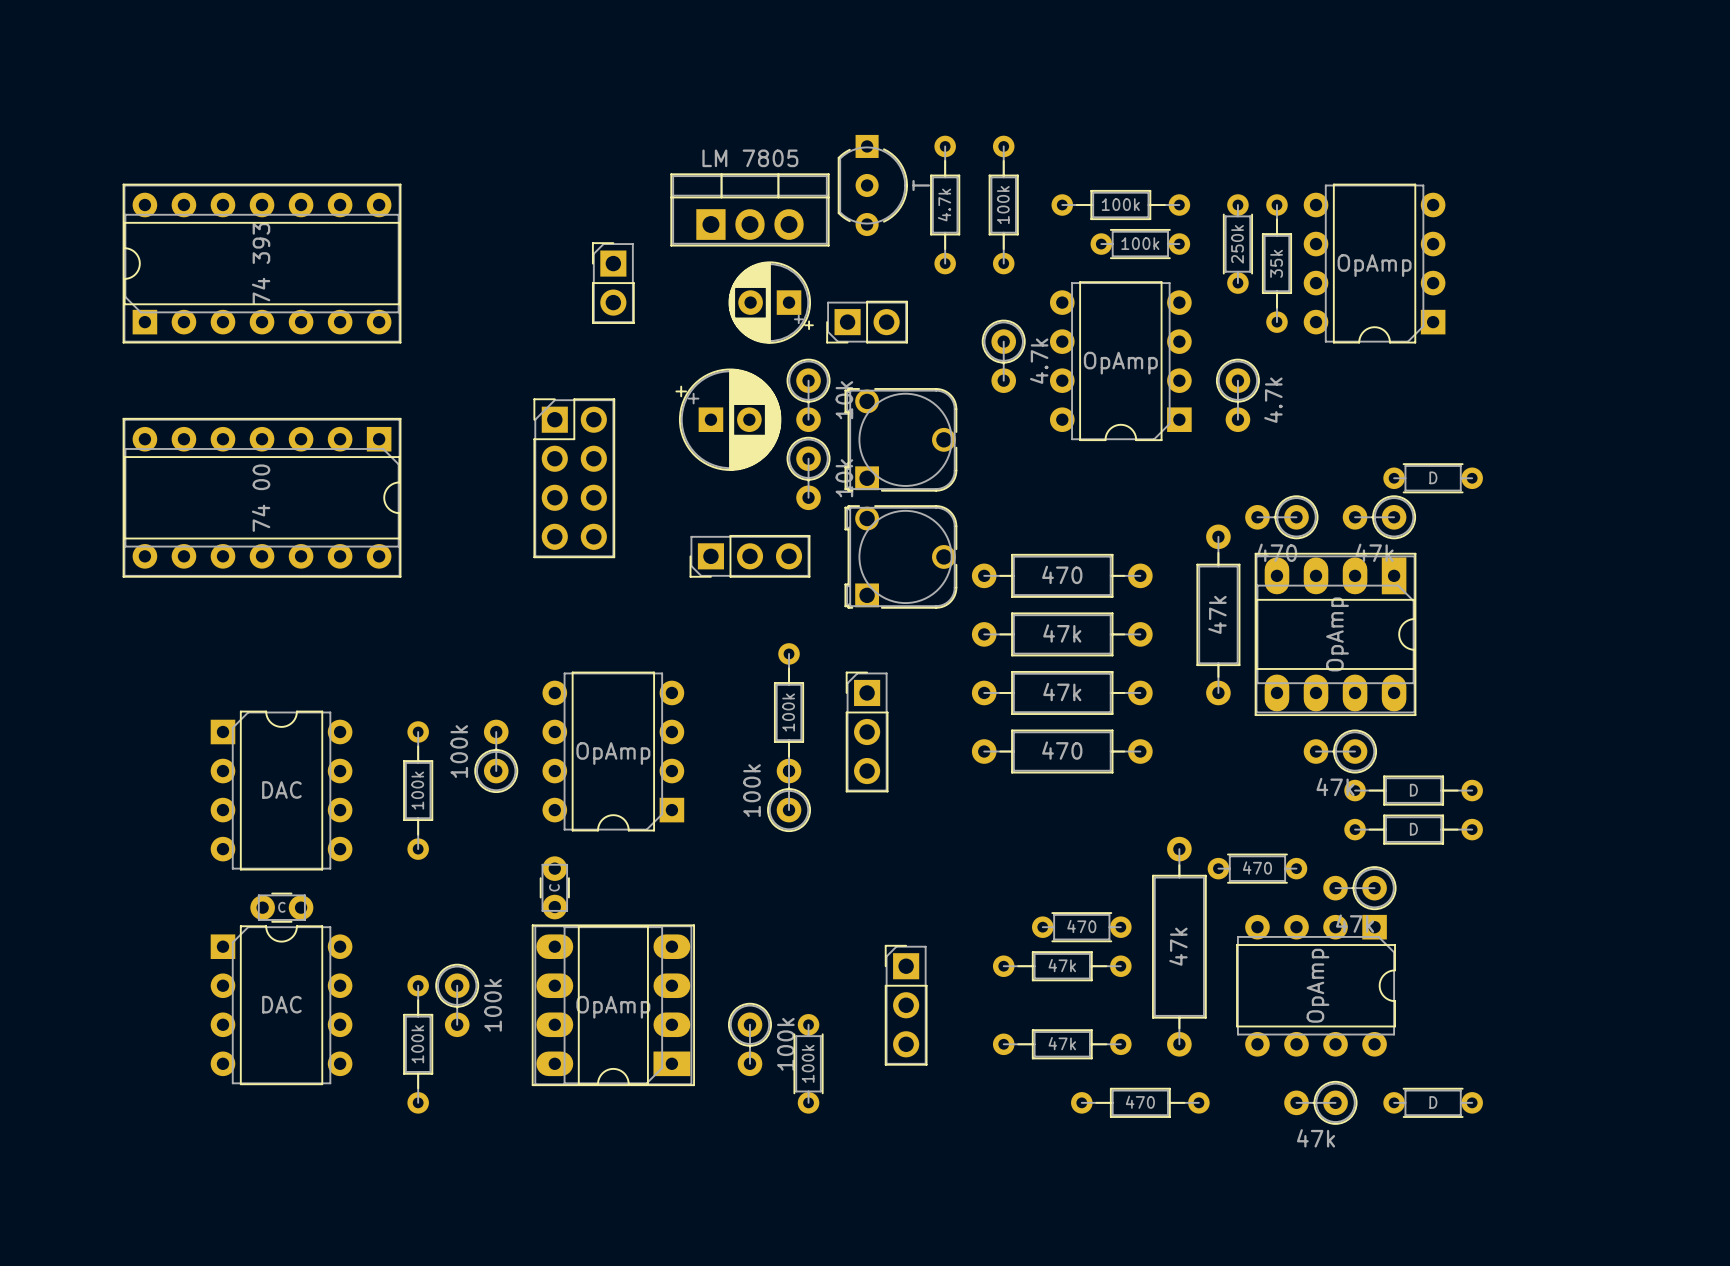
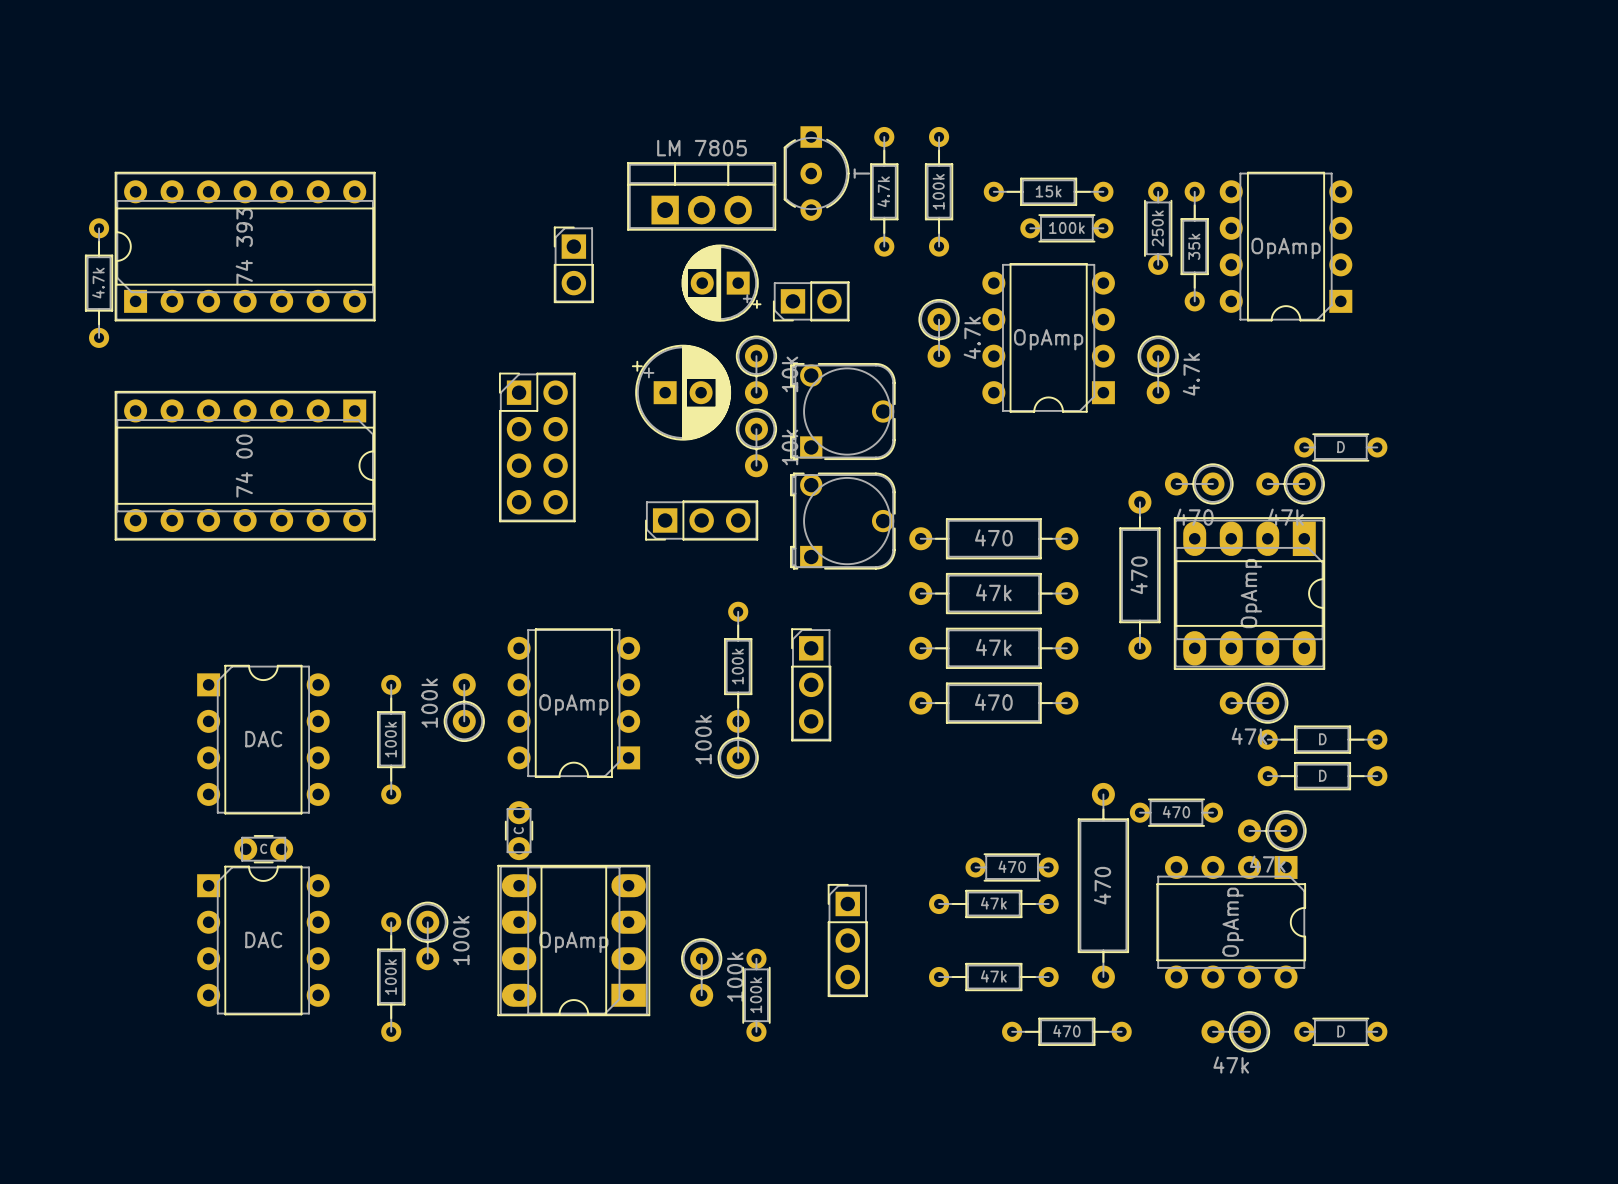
part text: 100k (1120, 204) -> 15k (1048, 191)
part: none -> (99, 283)
part text: 47k (1217, 614) -> 470 (1139, 575)
part text: 47k (1178, 946) -> 470 (1102, 885)

